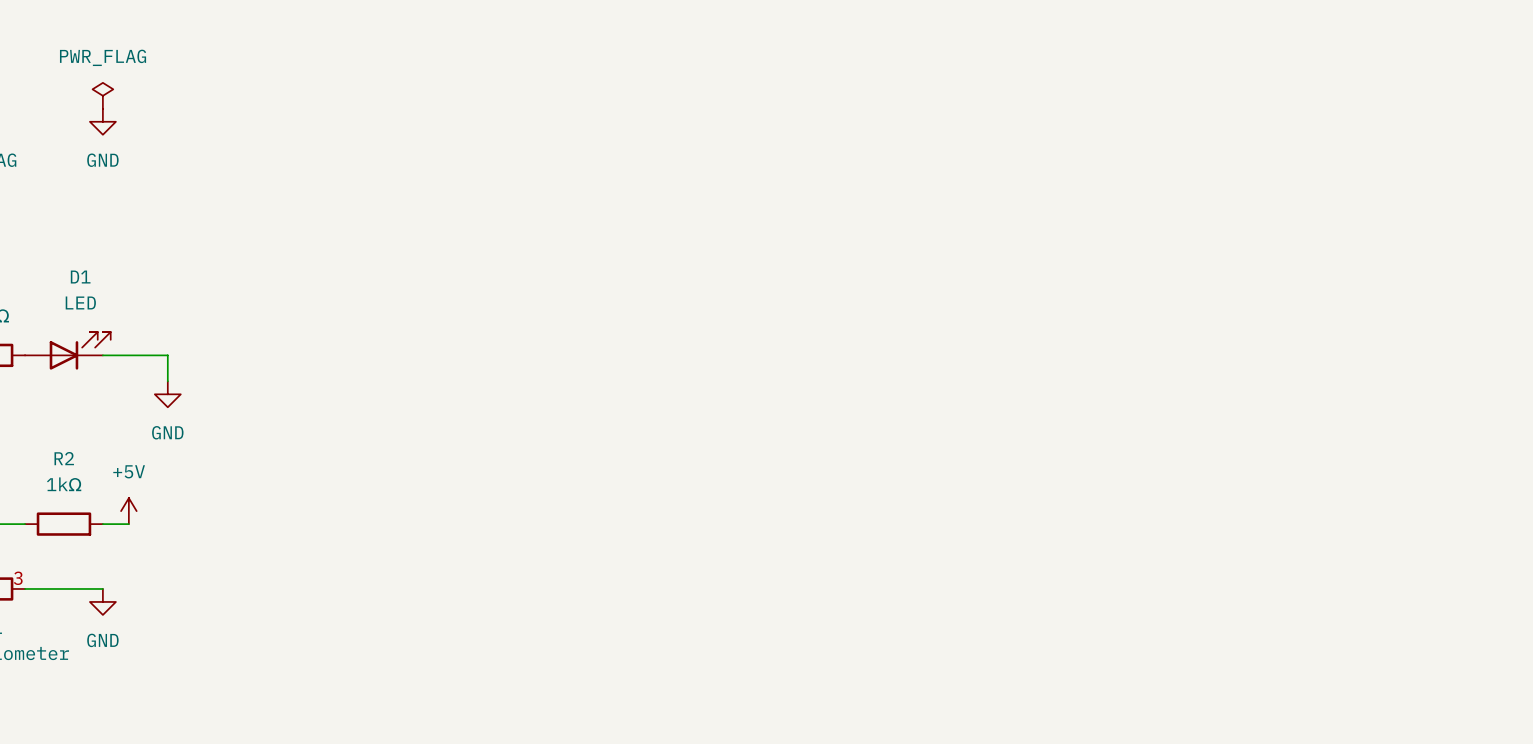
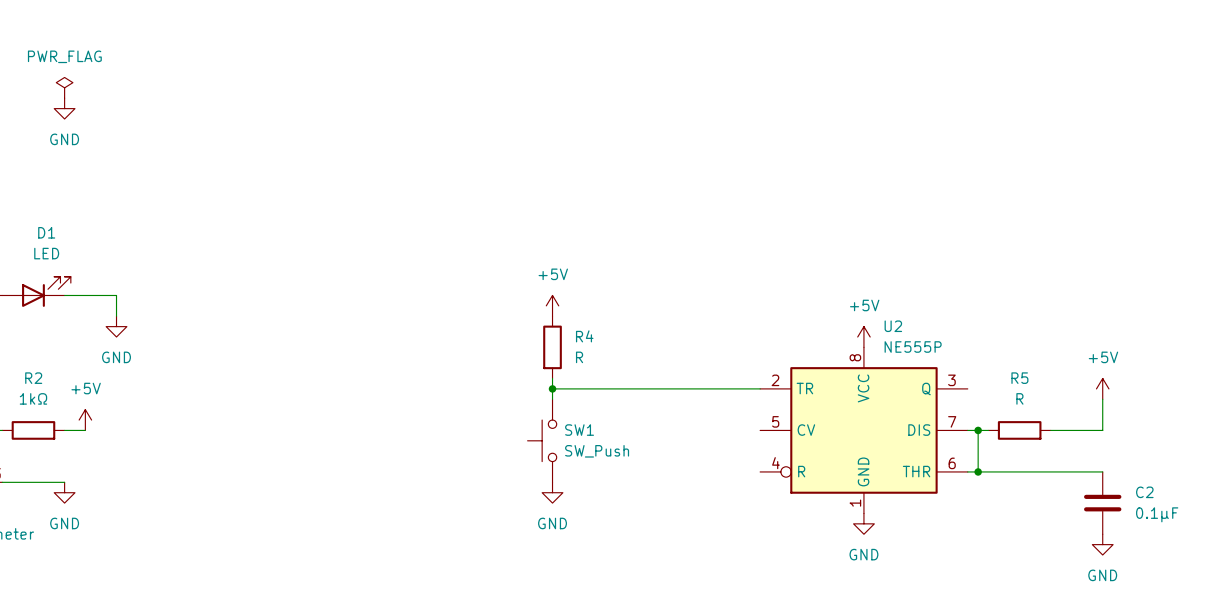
power symbol: none -> +5V (552, 305)
power symbol: none -> +5V (863, 337)
R4: none -> R (552, 347)
wire: none -> (552, 378) (552, 399)
wire: none -> (552, 388) (760, 388)
junction: none -> (552, 388)
power symbol: none -> +5V (1102, 388)
wire: none -> (1102, 399) (1102, 430) (1050, 430)
U2: none -> NE555P (863, 430)
wire: none -> (967, 430) (988, 430)
wire: none -> (978, 430) (978, 471)
junction: none -> (978, 430)
R5: none -> R (1019, 430)
SW1: none -> SW_Push (542, 440)
wire: none -> (967, 471) (1102, 471)
junction: none -> (978, 471)
power symbol: none -> GND (552, 492)
C2: none -> 0.1μF (1102, 503)
power symbol: none -> GND (863, 523)
power symbol: none -> GND (1102, 544)

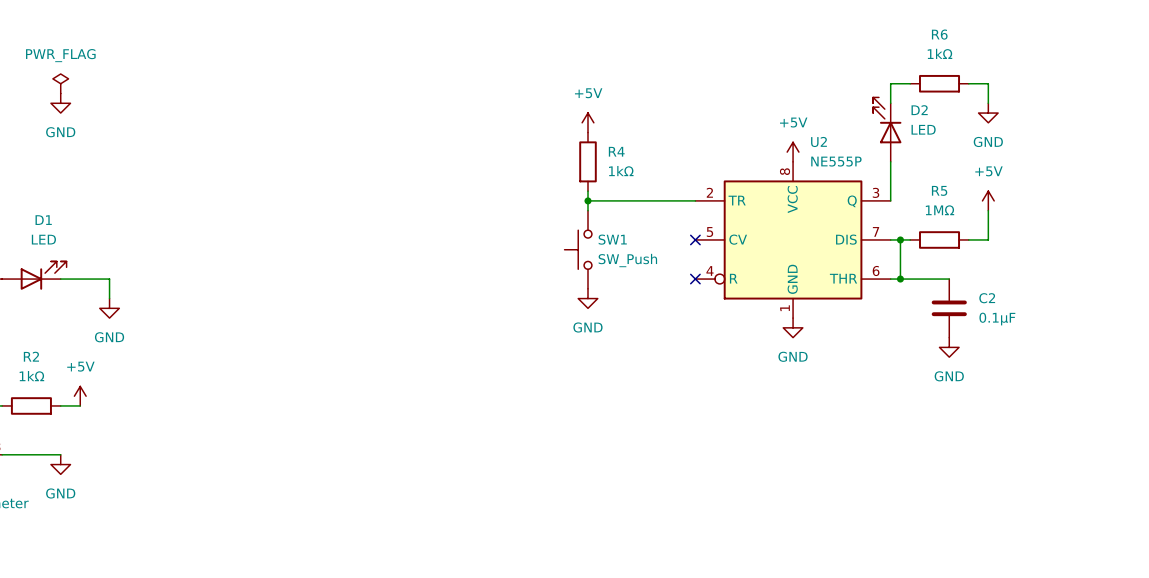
wire: none -> (910, 83) (890, 83) (890, 103)
R6: none -> 1kΩ (939, 83)
wire: none -> (968, 83) (988, 83) (988, 103)
power symbol: none -> GND (988, 113)
power symbol: none -> +5V (587, 122)
D2: none -> LED (887, 129)
power symbol: none -> +5V (793, 152)
wire: none -> (890, 161) (890, 200)
wire: none -> (587, 200) (695, 200)
junction: none -> (587, 200)
power symbol: none -> +5V (988, 200)
wire: none -> (988, 210) (988, 239) (968, 239)
no-connect mark: none -> (695, 239)
junction: none -> (900, 239)
no-connect mark: none -> (695, 279)
wire: none -> (890, 279) (949, 279)
junction: none -> (900, 279)
power symbol: +5V (552, 305) -> none
power symbol: none -> GND (587, 298)
power symbol: +5V (863, 337) -> none
R4 position: (552, 347) -> (587, 161)
power symbol: none -> GND (793, 327)
R4 value: R (579, 357) -> 1kΩ (621, 171)
power symbol: none -> GND (949, 347)
wire: (552, 378) (552, 399) -> (587, 191) (587, 210)
wire: (552, 388) (760, 388) -> none
junction: (552, 388) -> none
power symbol: +5V (1102, 388) -> none
R5 value: R (1019, 398) -> 1MΩ (939, 210)
wire: (1102, 399) (1102, 430) (1050, 430) -> none
U2 position: (863, 430) -> (793, 239)
wire: (967, 430) (988, 430) -> (890, 239) (910, 239)
wire: (978, 430) (978, 471) -> (900, 239) (900, 279)
junction: (978, 430) -> none
R5 position: (1019, 430) -> (939, 239)
SW1 position: (542, 440) -> (578, 249)
wire: (967, 471) (1102, 471) -> none
junction: (978, 471) -> none
power symbol: GND (552, 492) -> none
C2 position: (1102, 503) -> (949, 308)
power symbol: GND (863, 523) -> none
power symbol: GND (1102, 544) -> none

